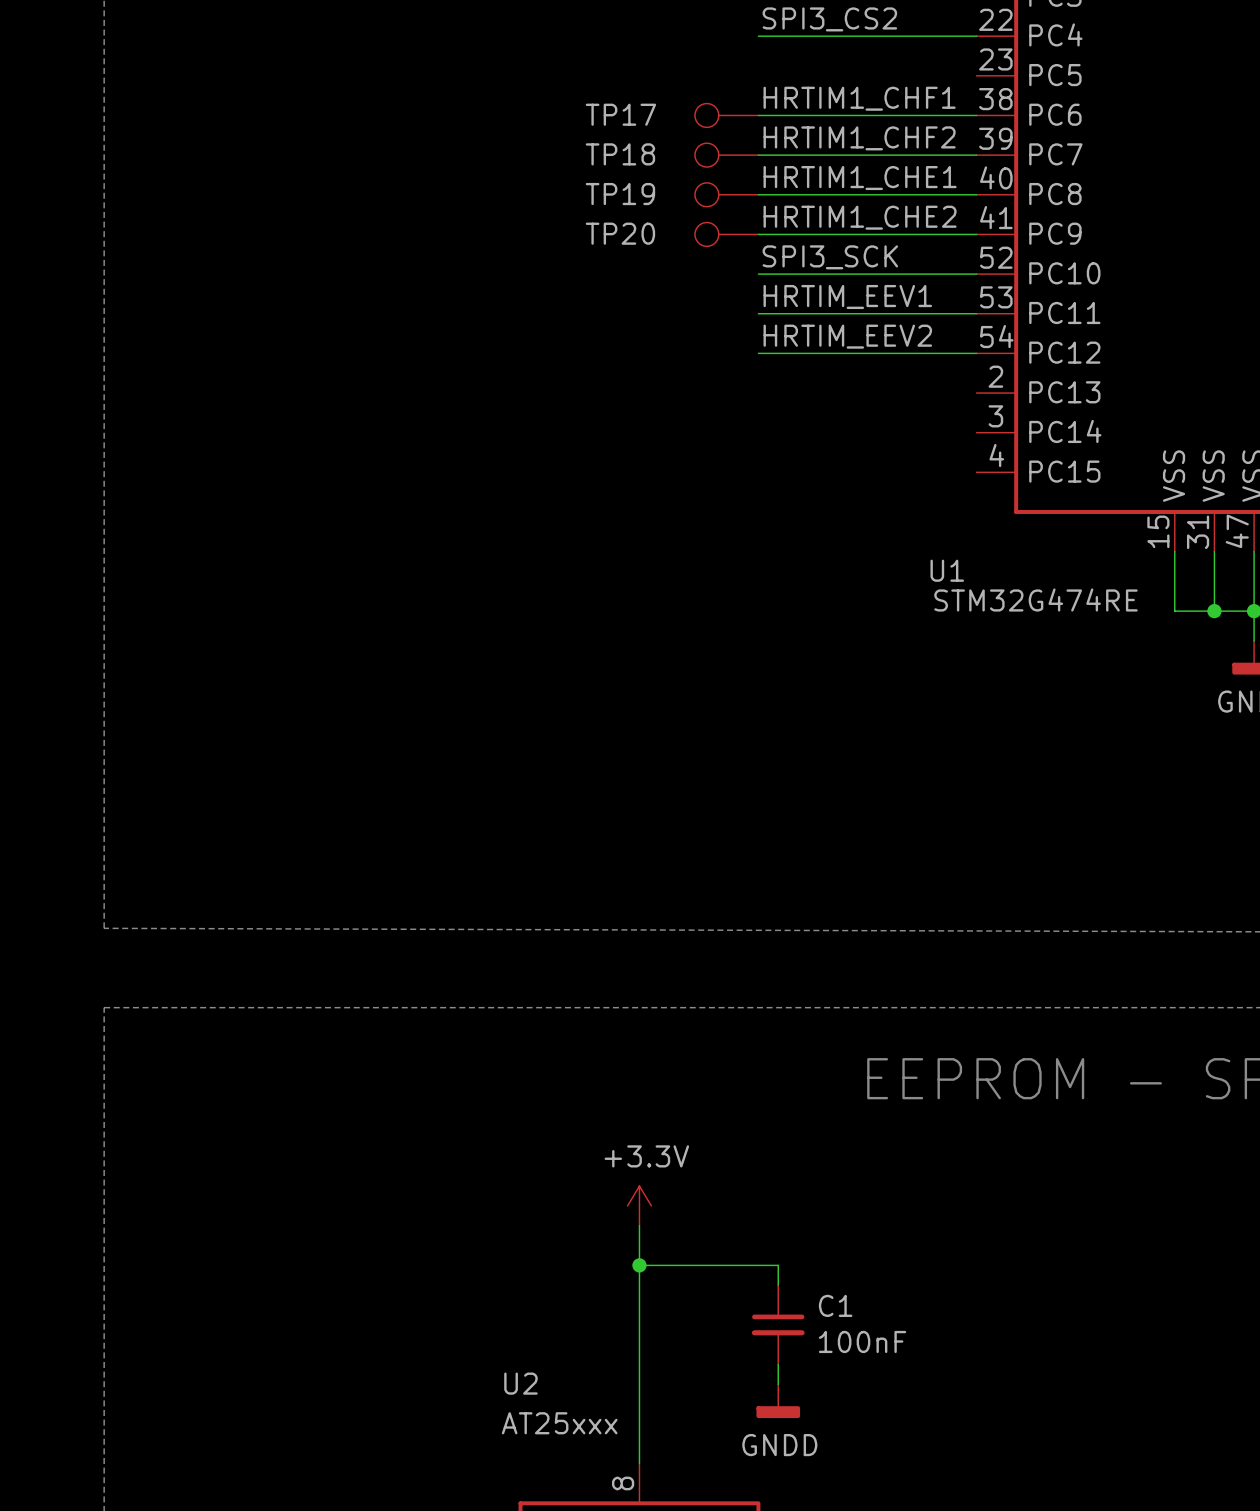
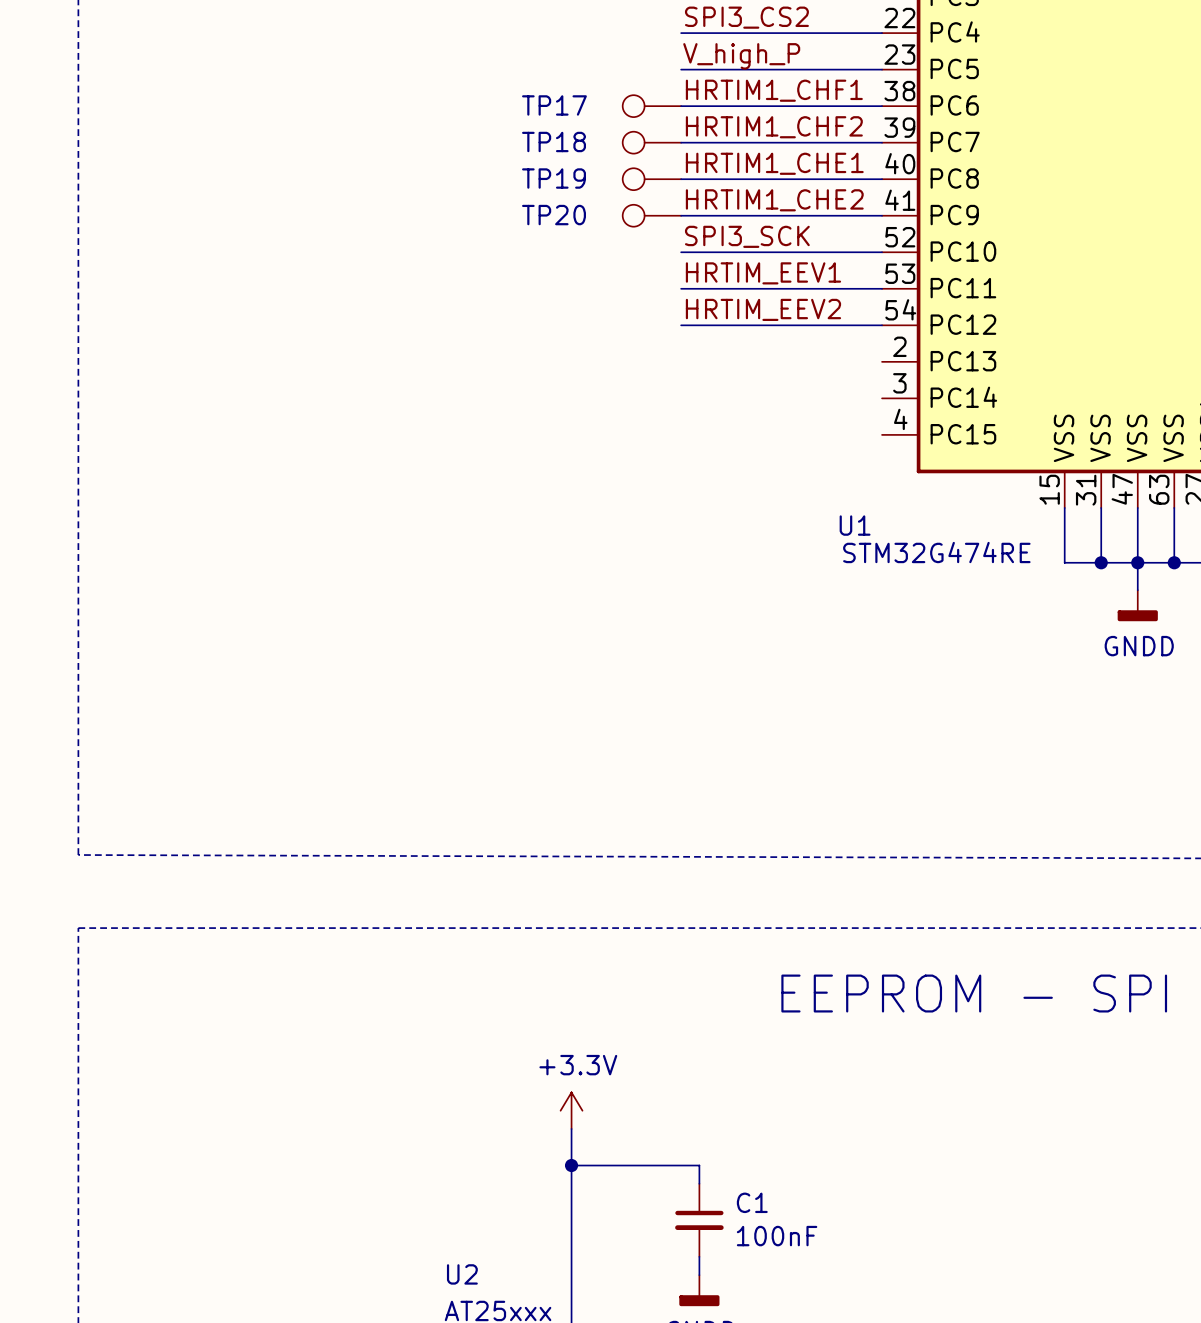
label: none -> V_high_P (741, 56)
wire: none -> (681, 69) (882, 69)

